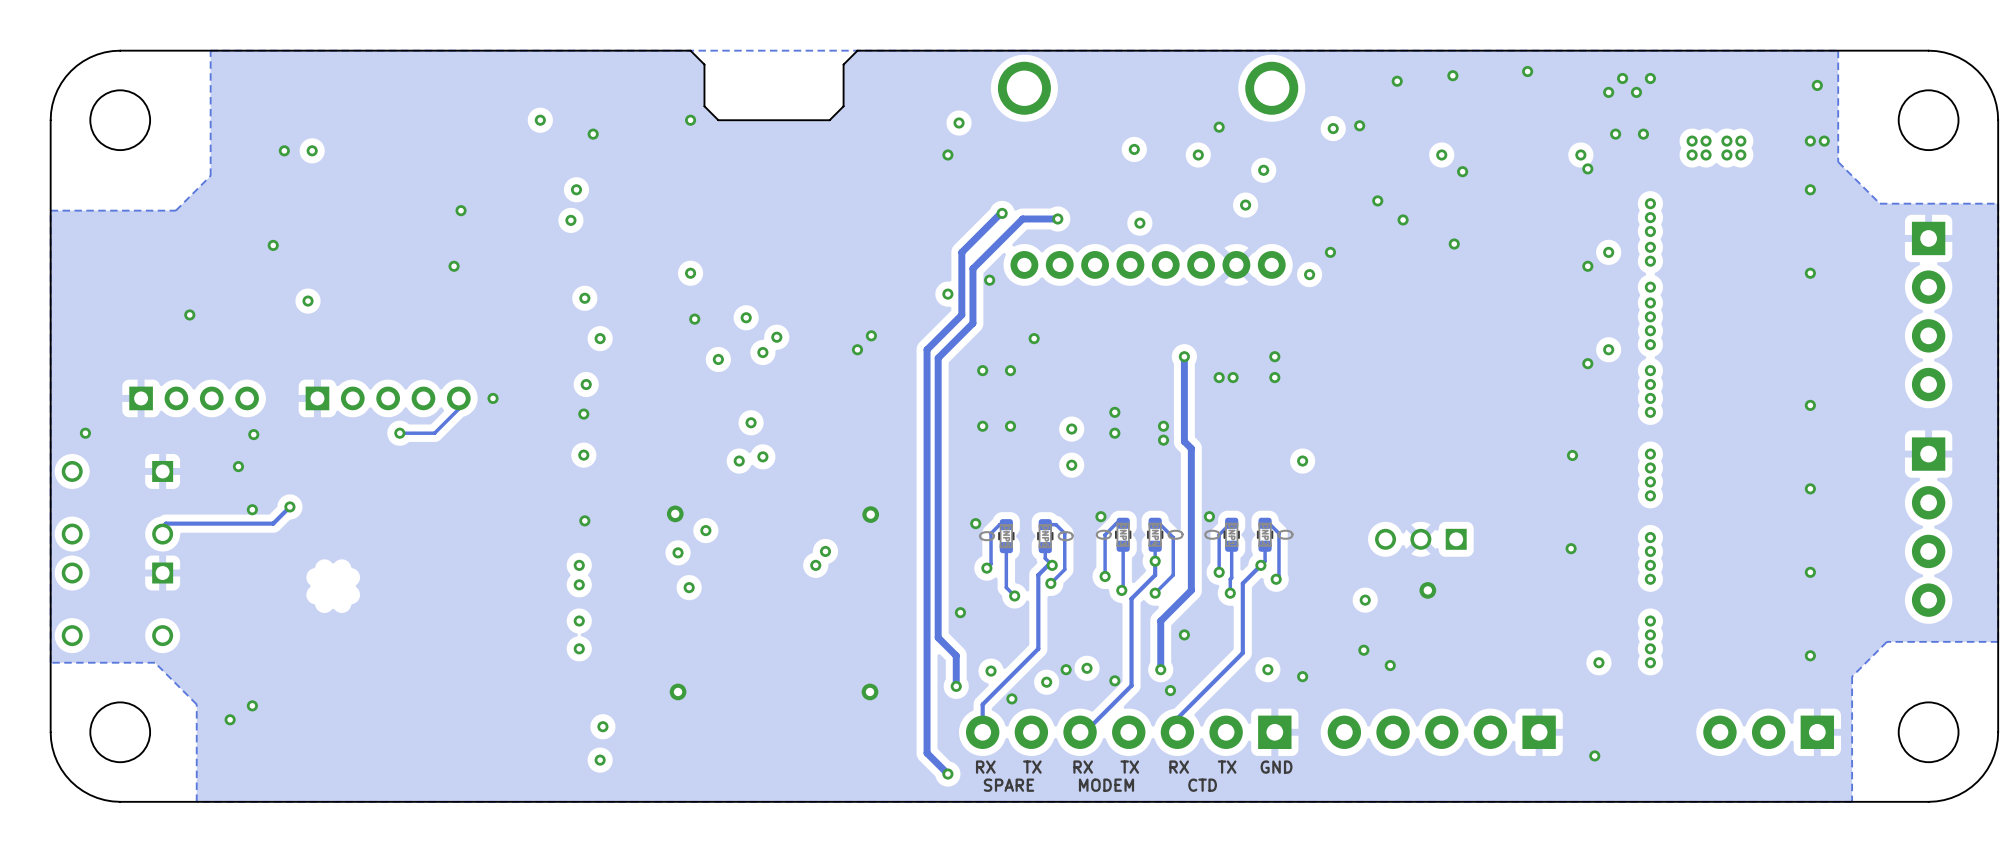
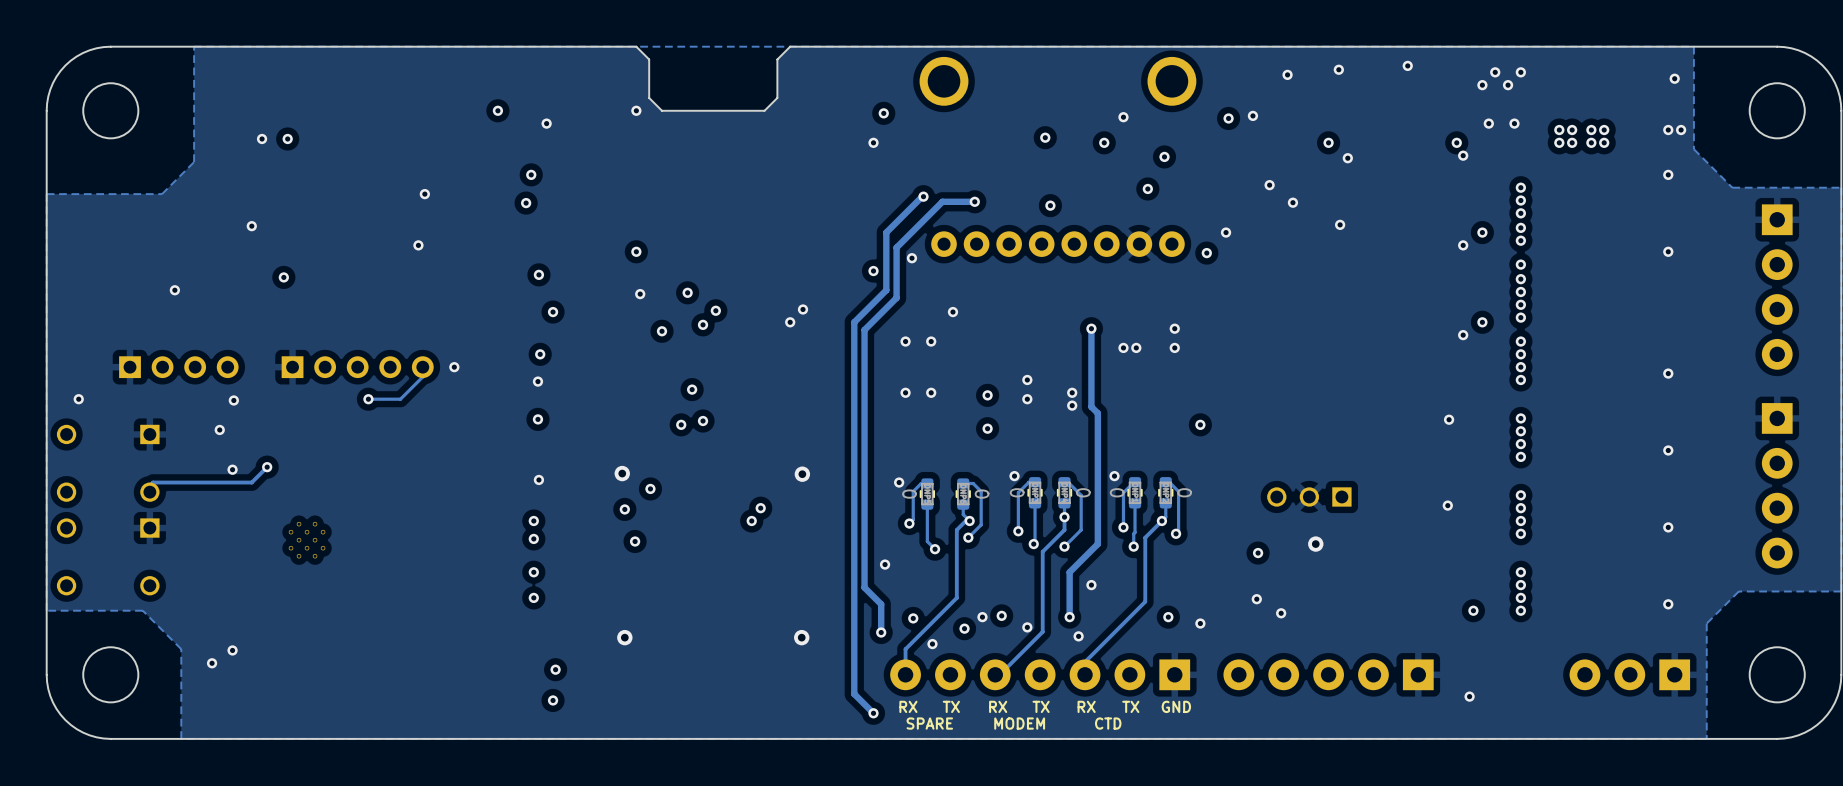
part: none -> (307, 540)

